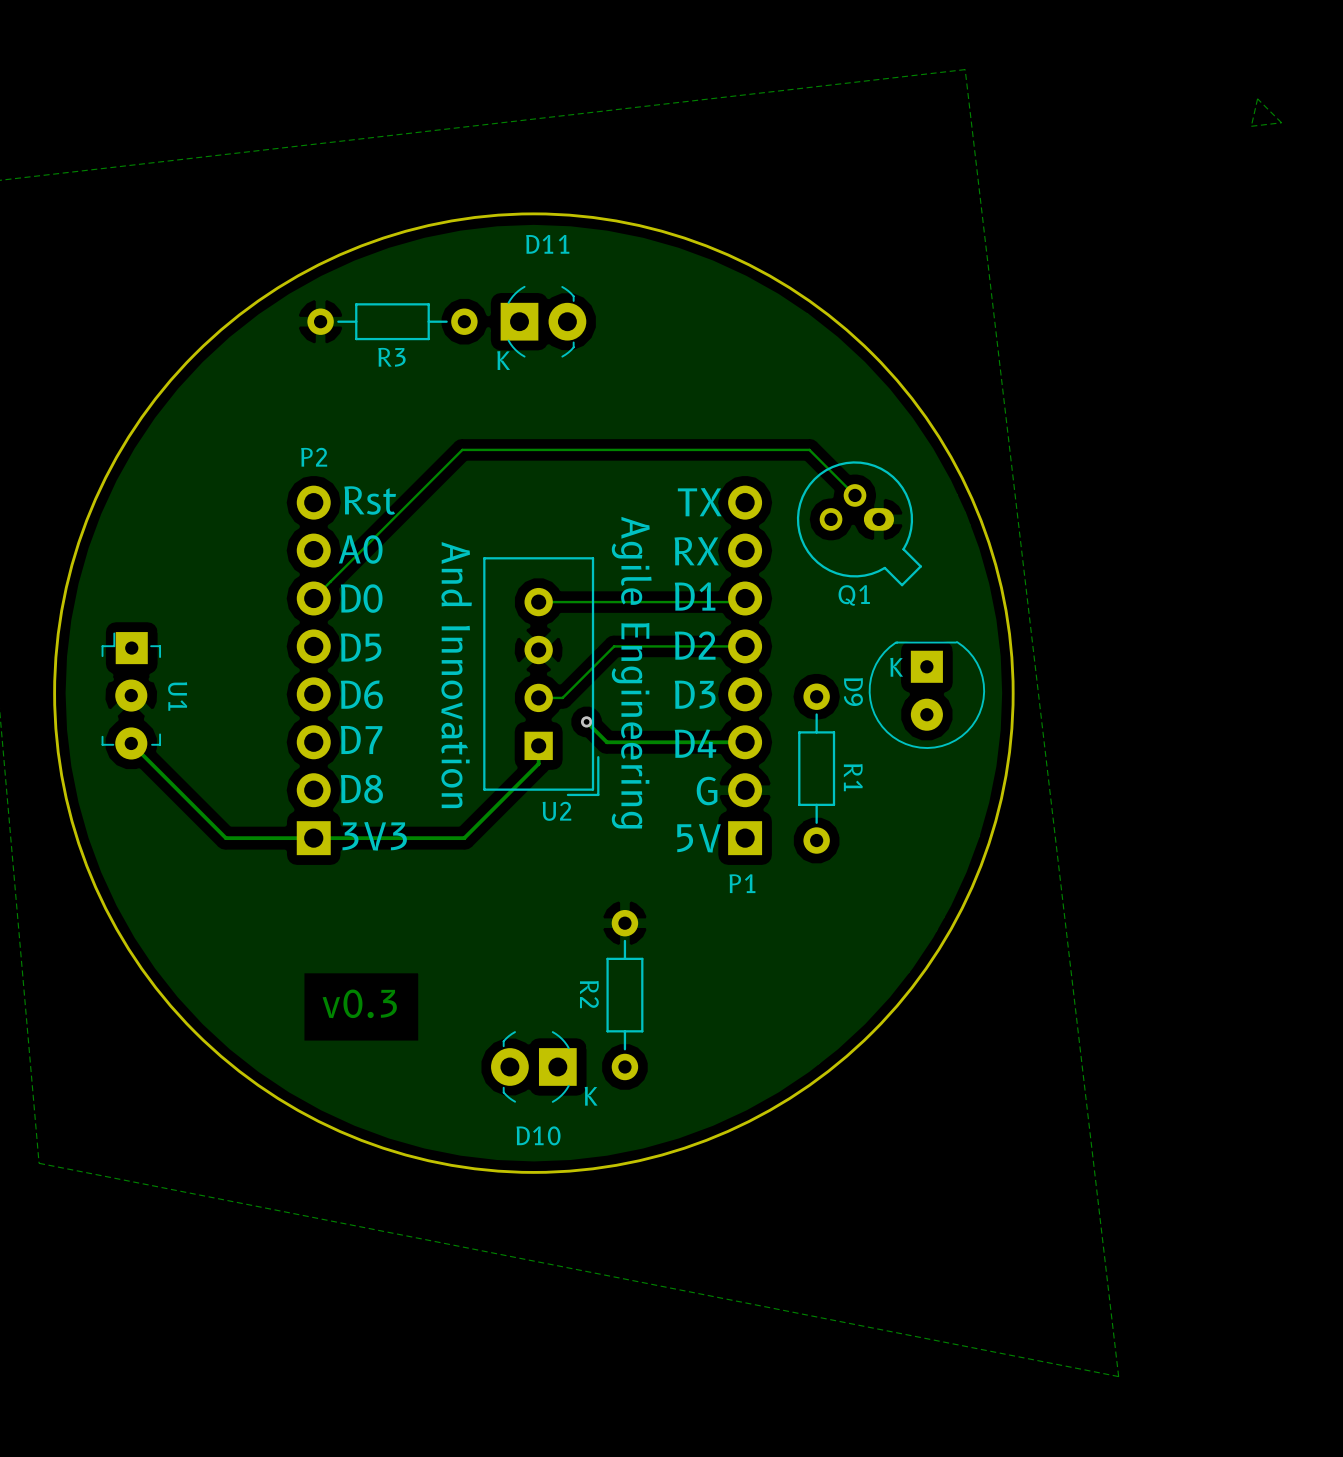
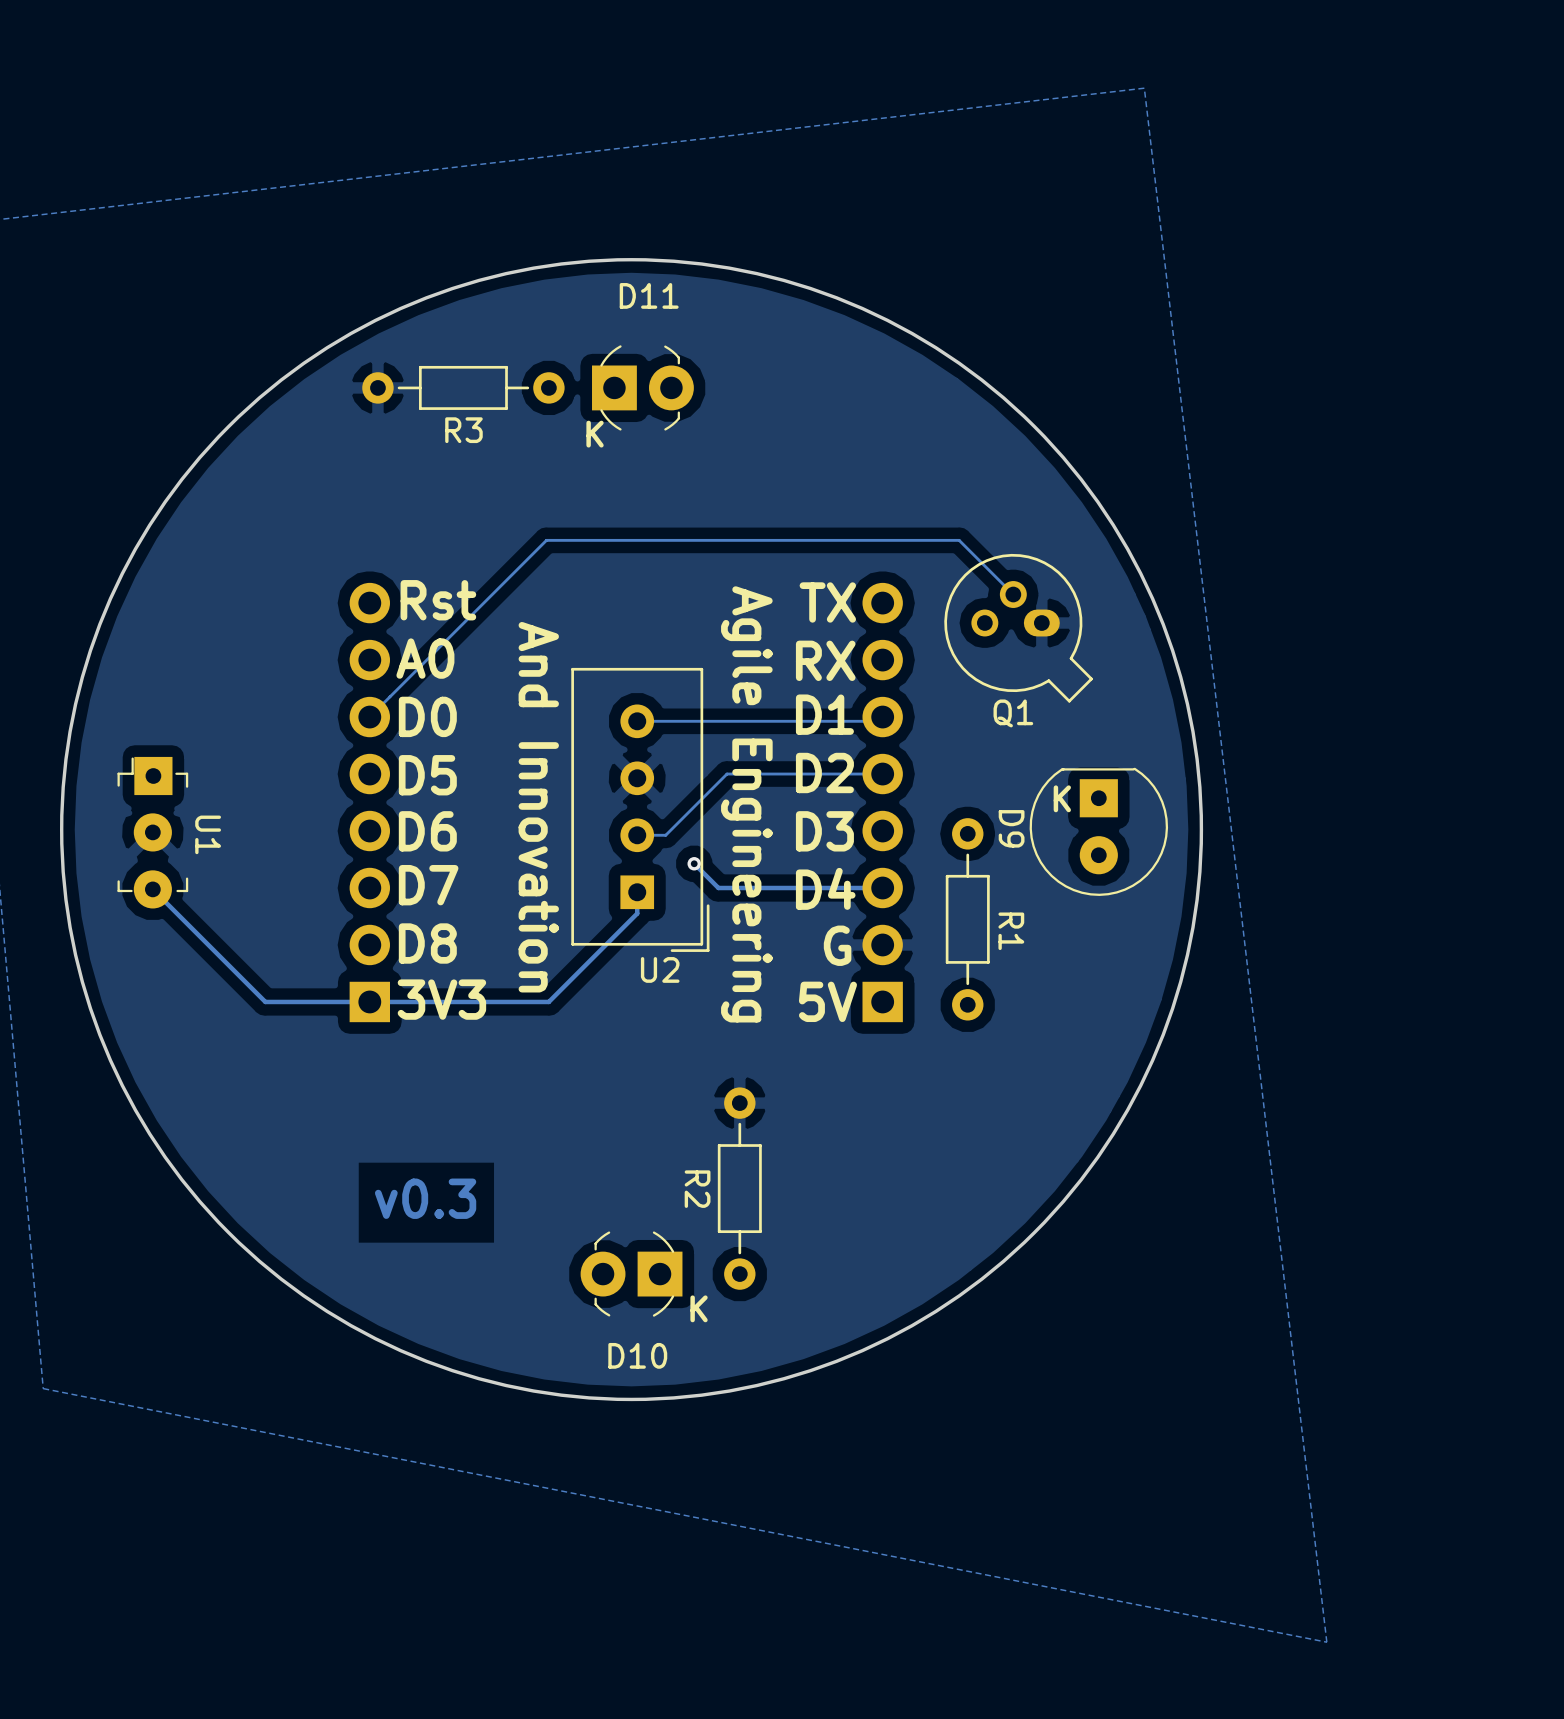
zone outline: (1257, 98) (1281, 122) (1251, 126) (1257, 98) -> none
P2 name: P2 (314, 457) -> none
P1 name: P1 (742, 883) -> none

